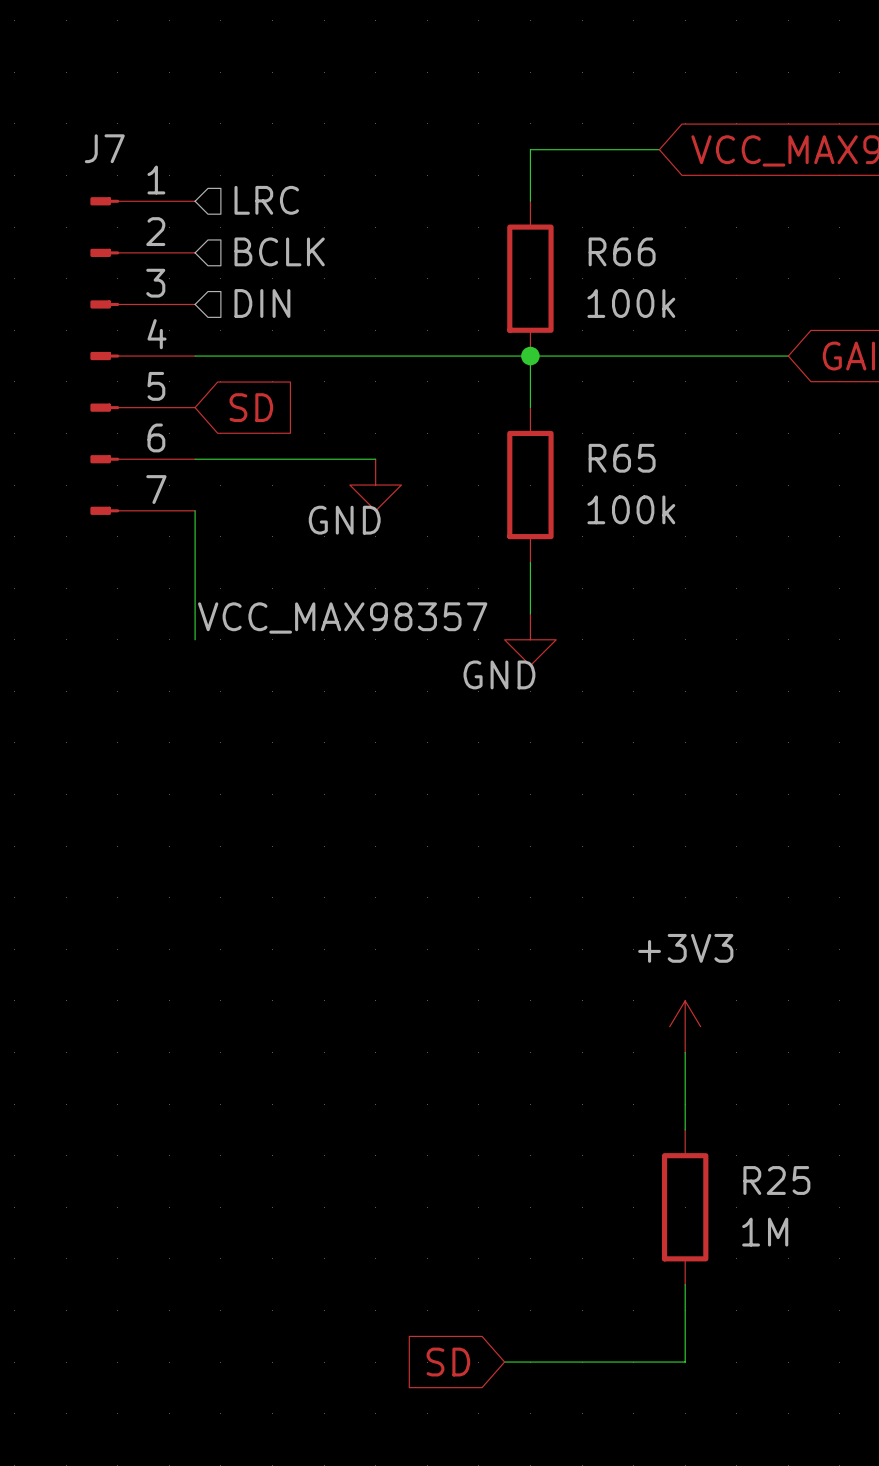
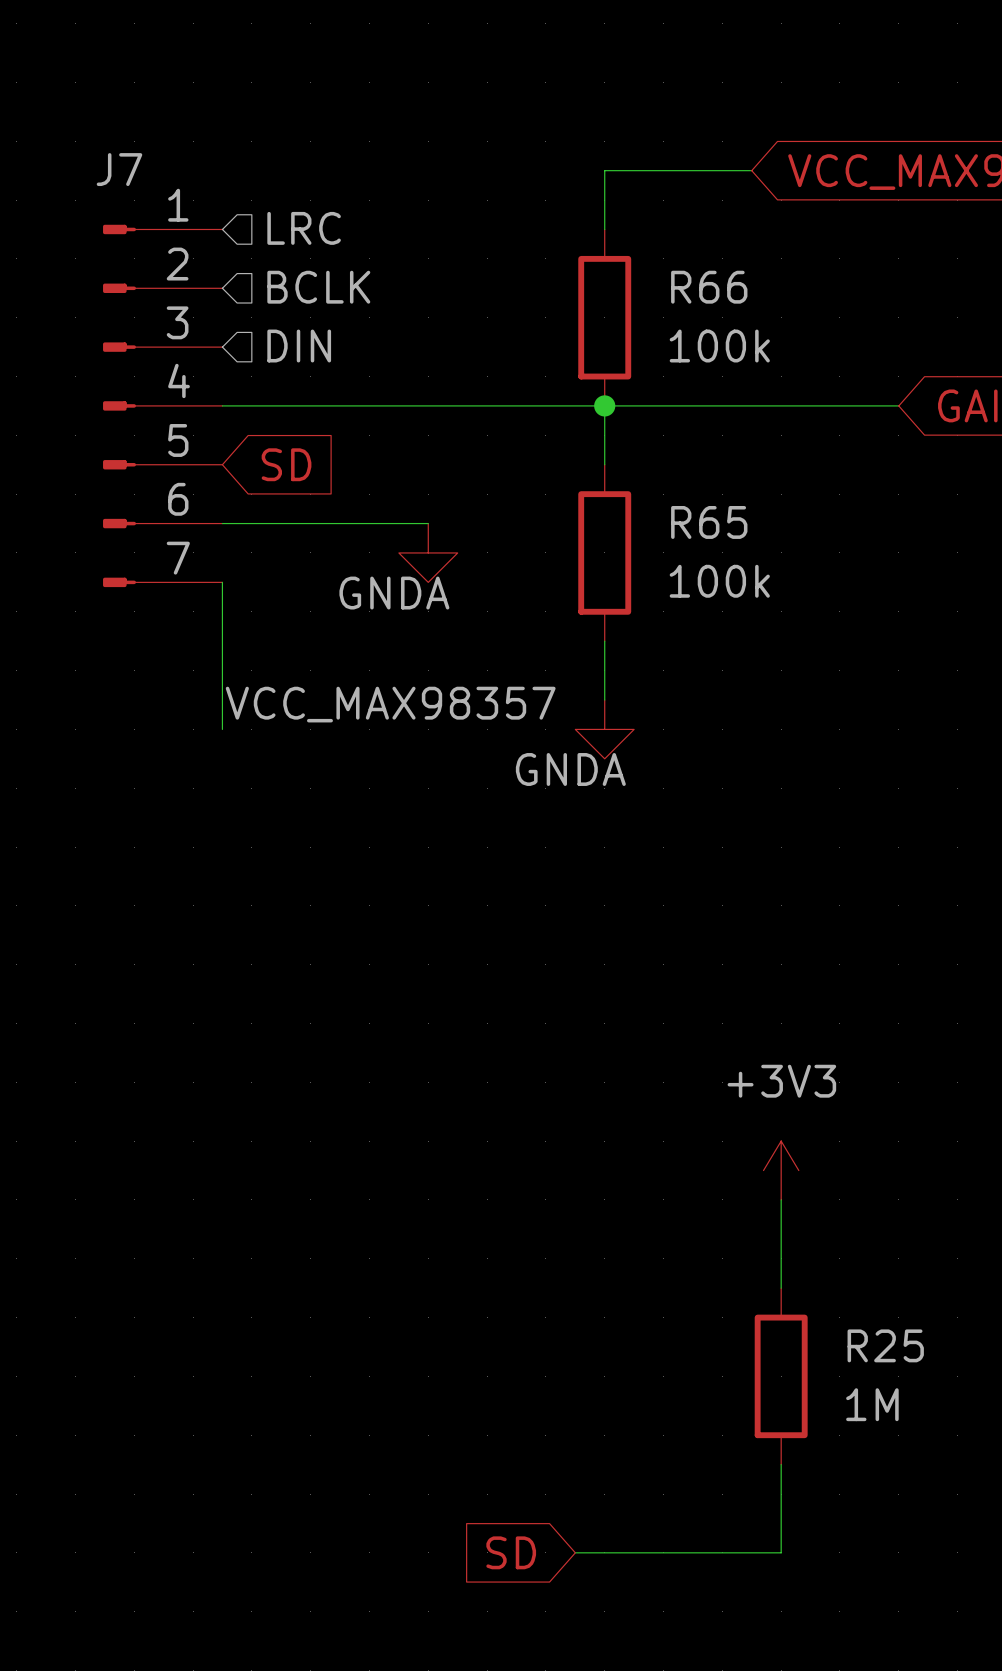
power symbol: GND (375, 485) -> GNDA (428, 552)
power symbol: GND (530, 639) -> GNDA (604, 729)

